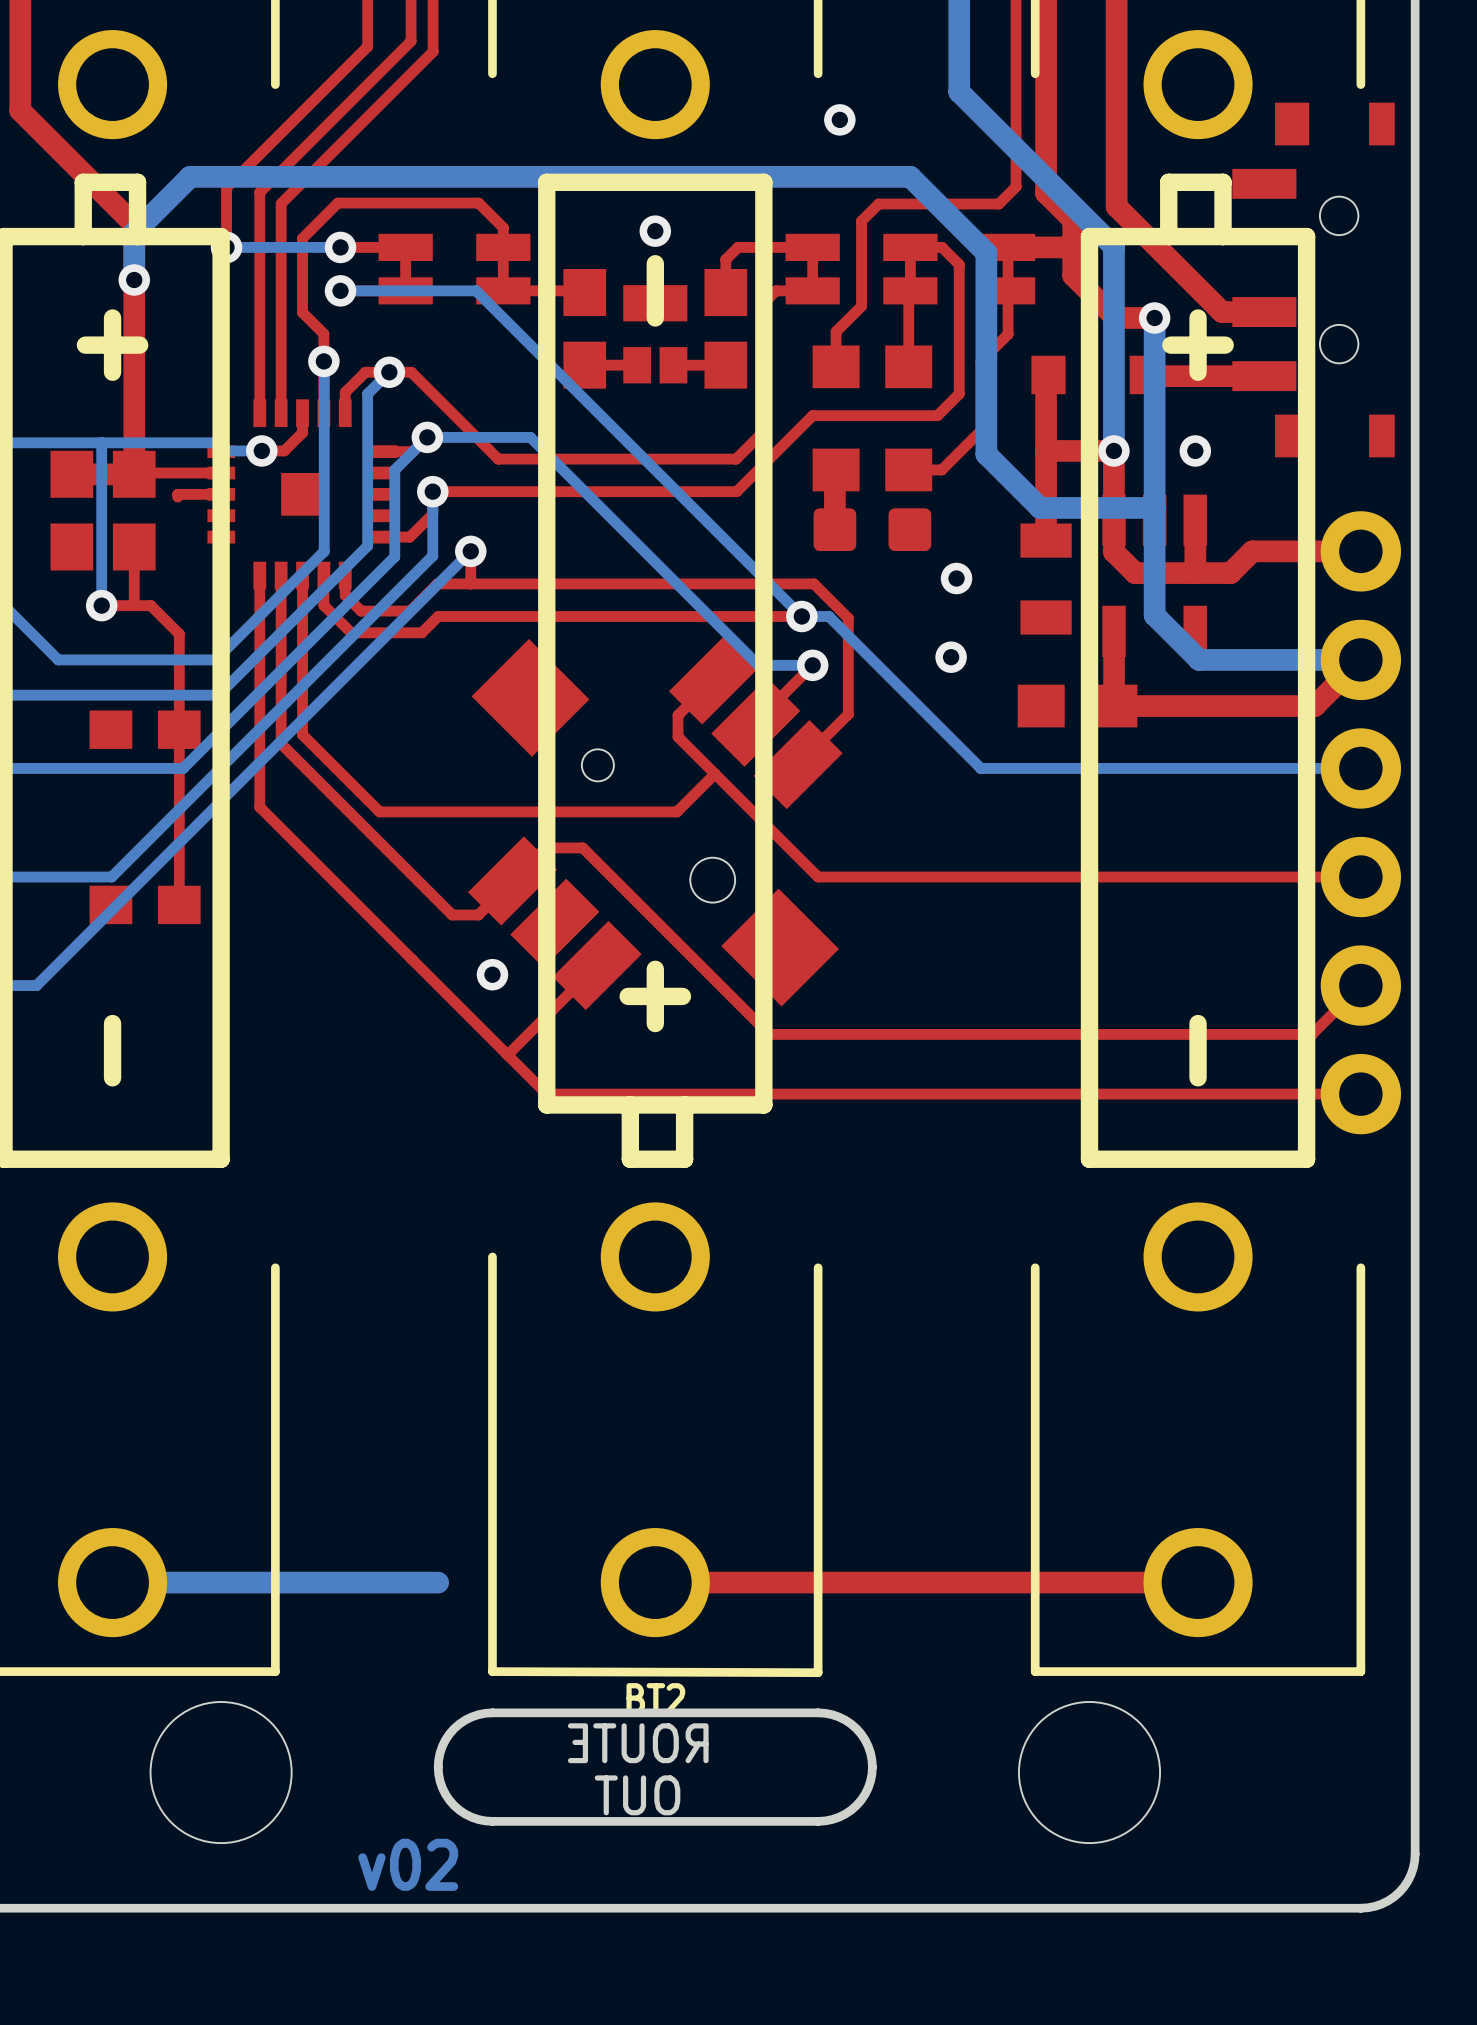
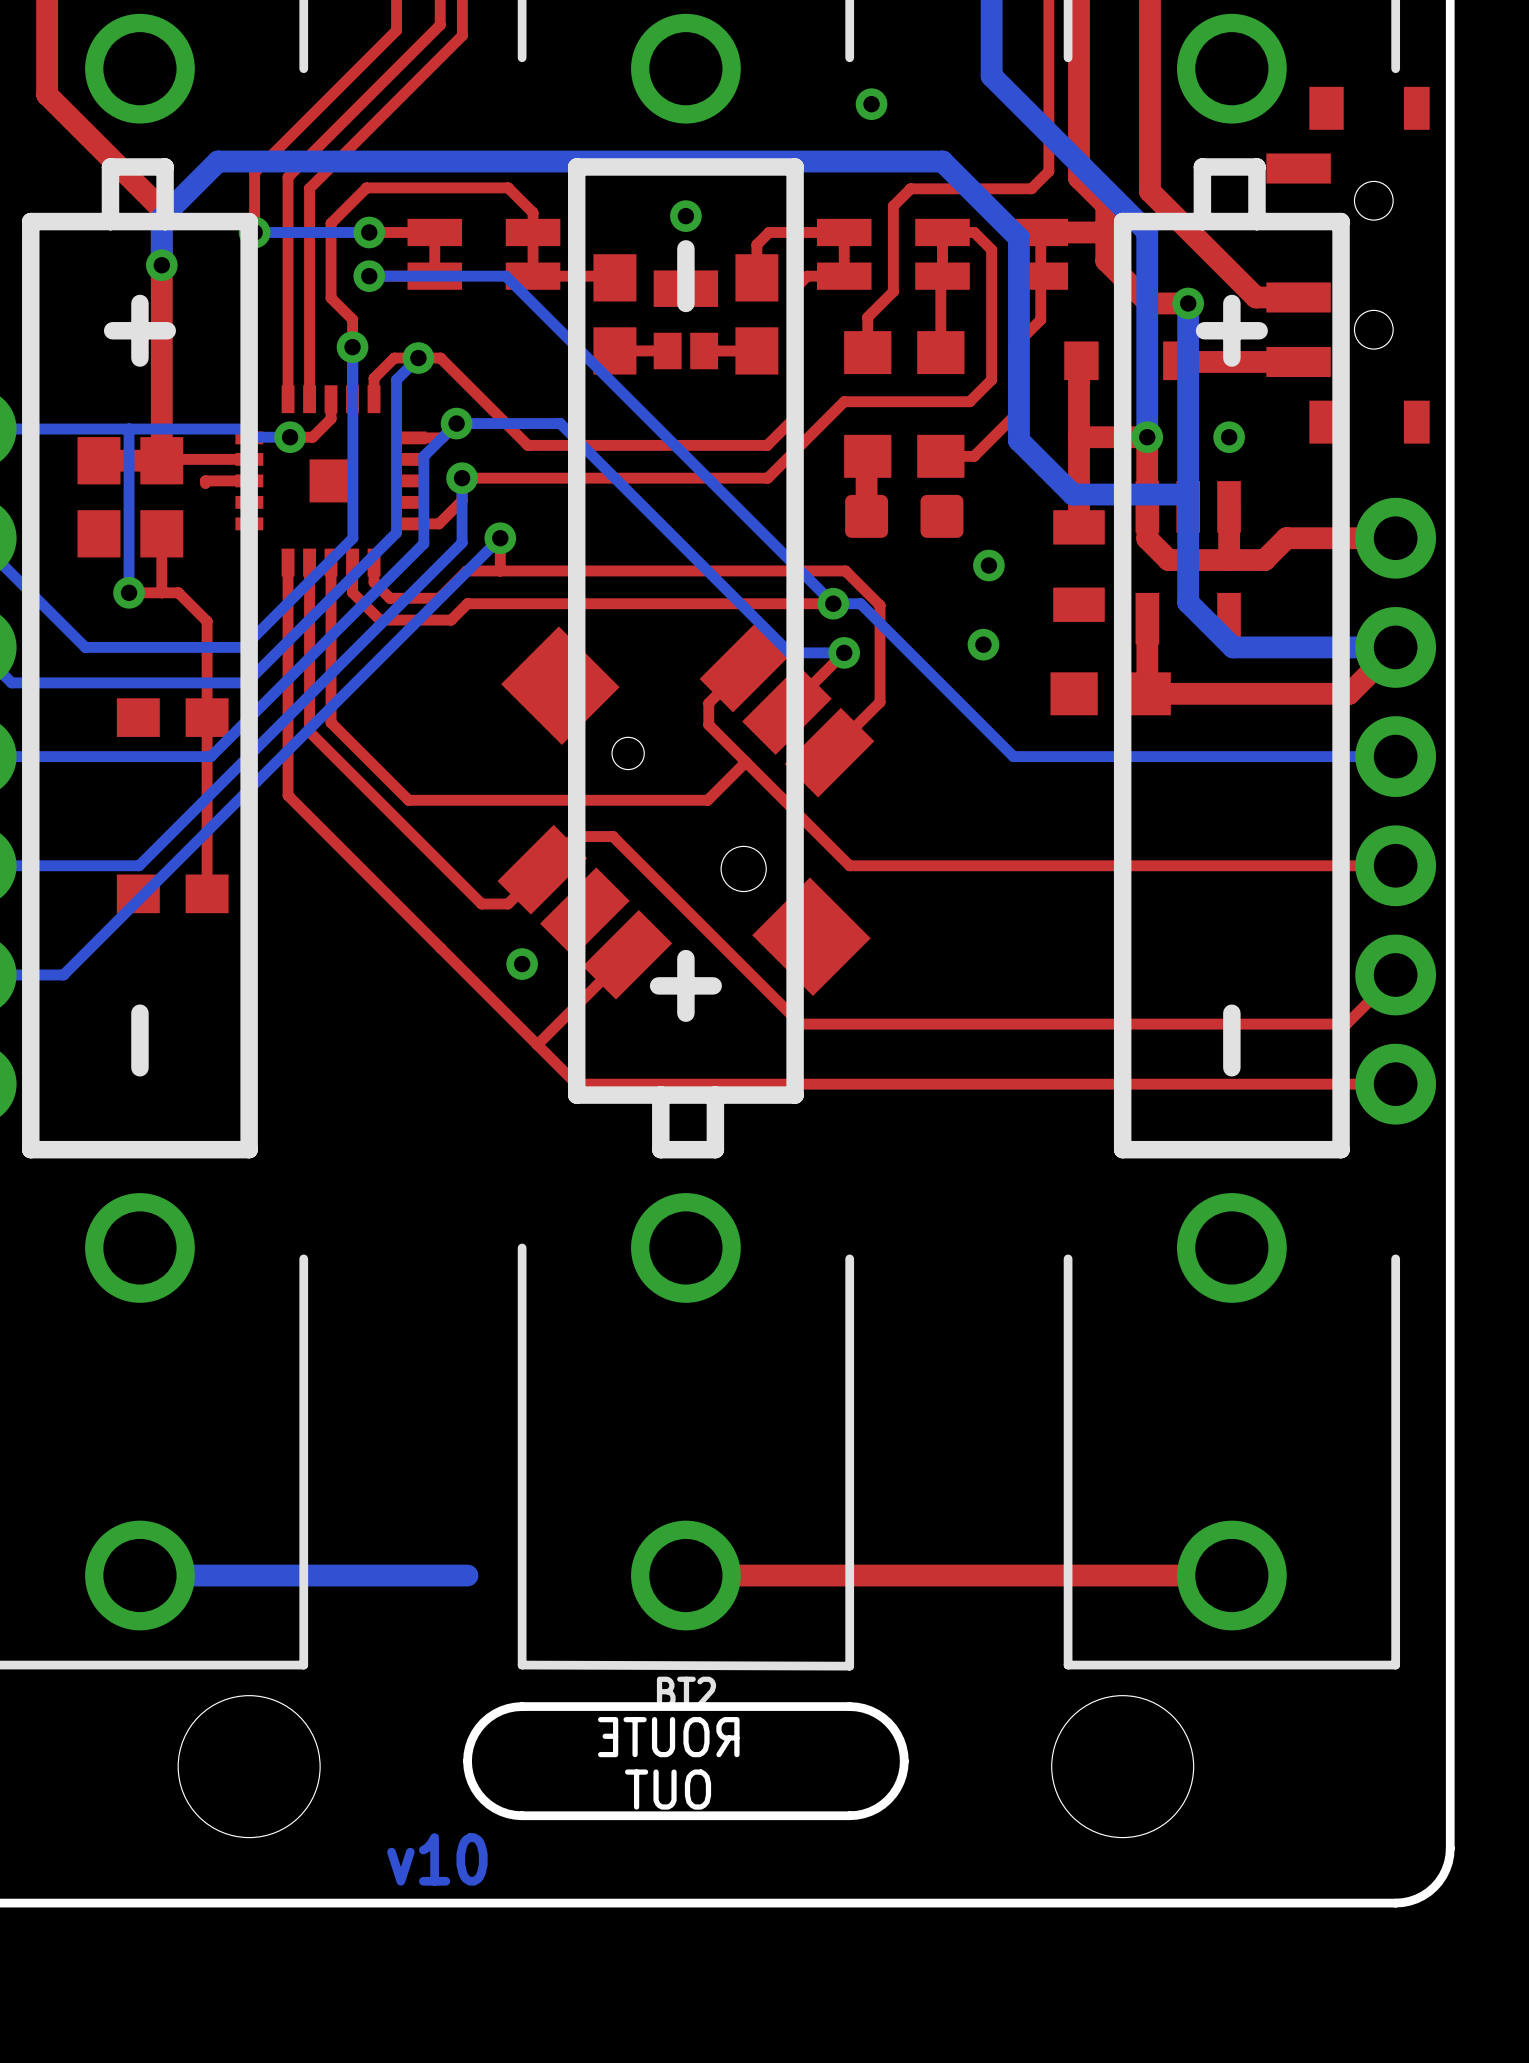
text: v02 (408, 1864) -> v10 (437, 1859)

